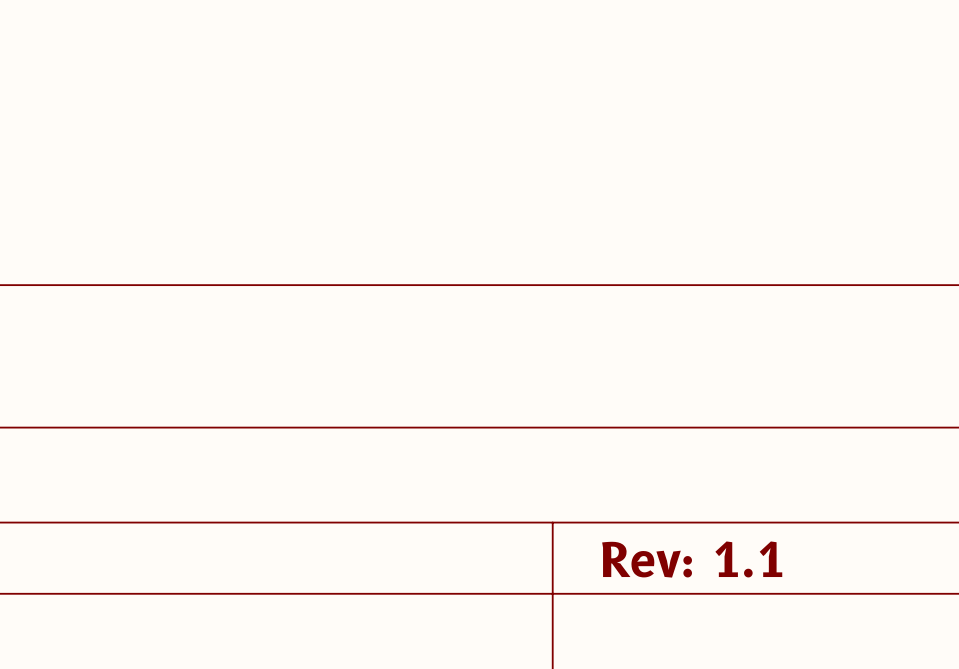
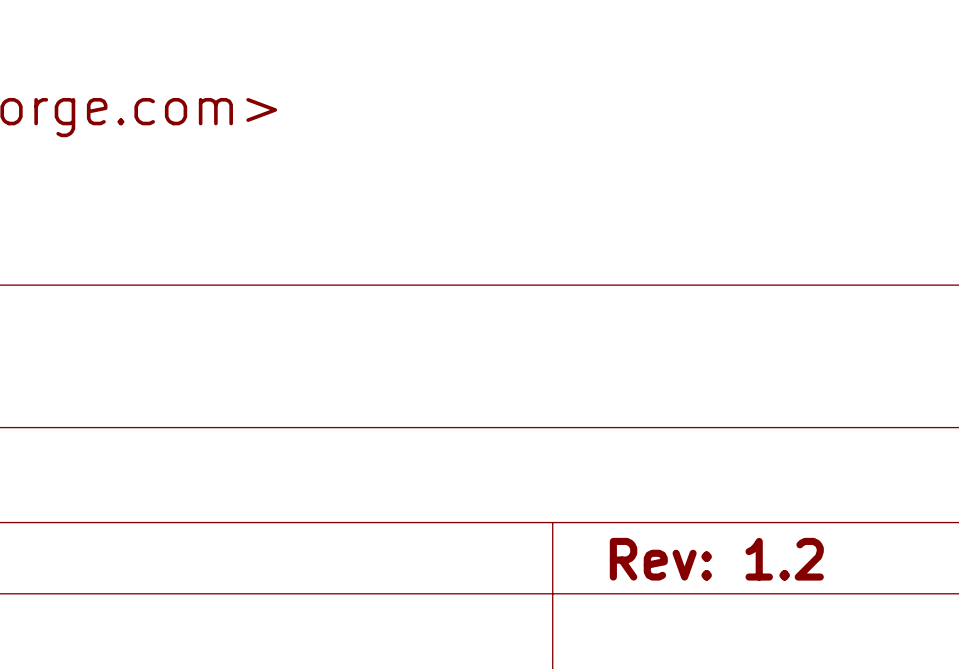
title block: Rev: 1.1 (692, 559) -> Rev: 1.2 (716, 559)

